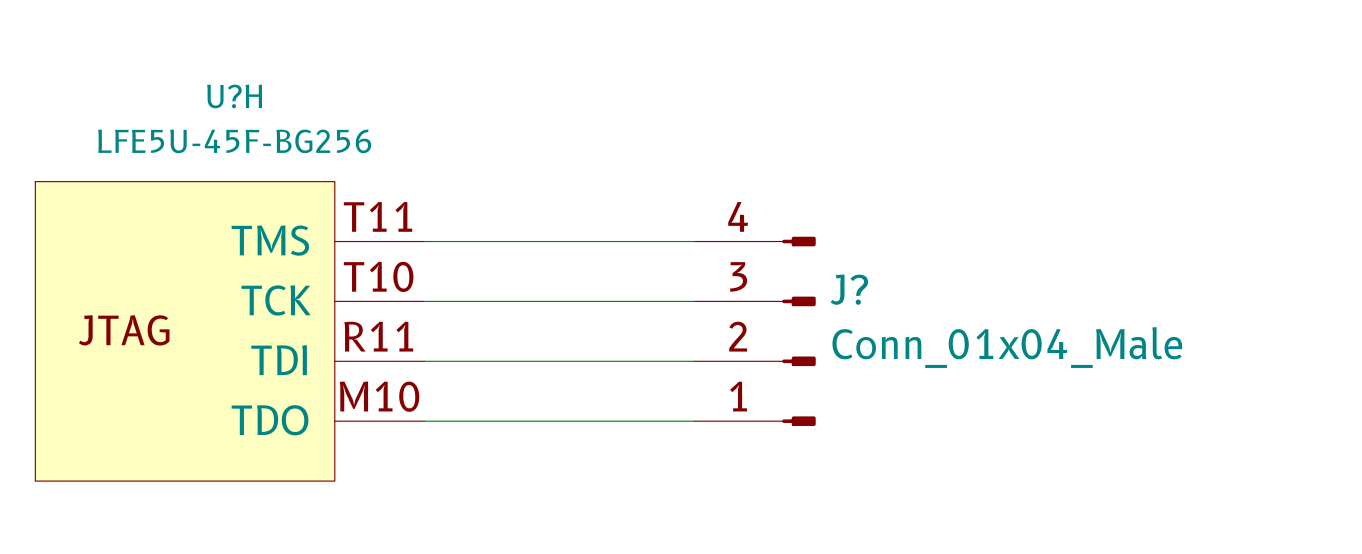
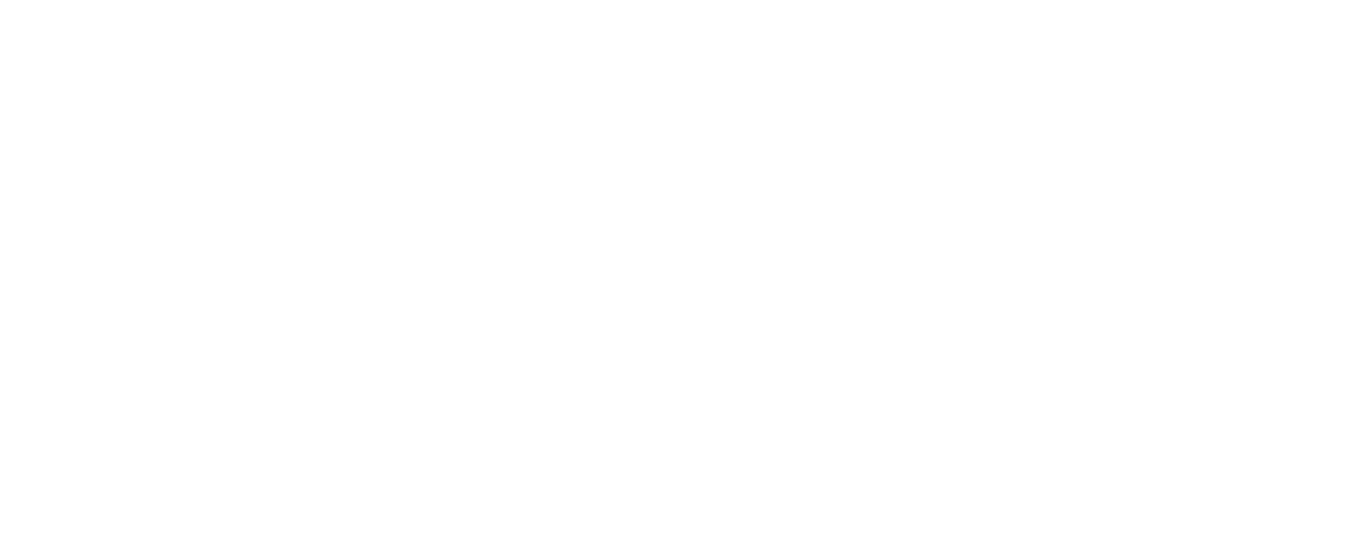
wire: (424, 241) (694, 241) -> none
wire: (424, 301) (694, 301) -> none
U?H: LFE5U-45F-BG256 (229, 331) -> none
J?: Conn_01x04_Male (754, 331) -> none
wire: (424, 361) (694, 361) -> none
wire: (424, 421) (694, 421) -> none

